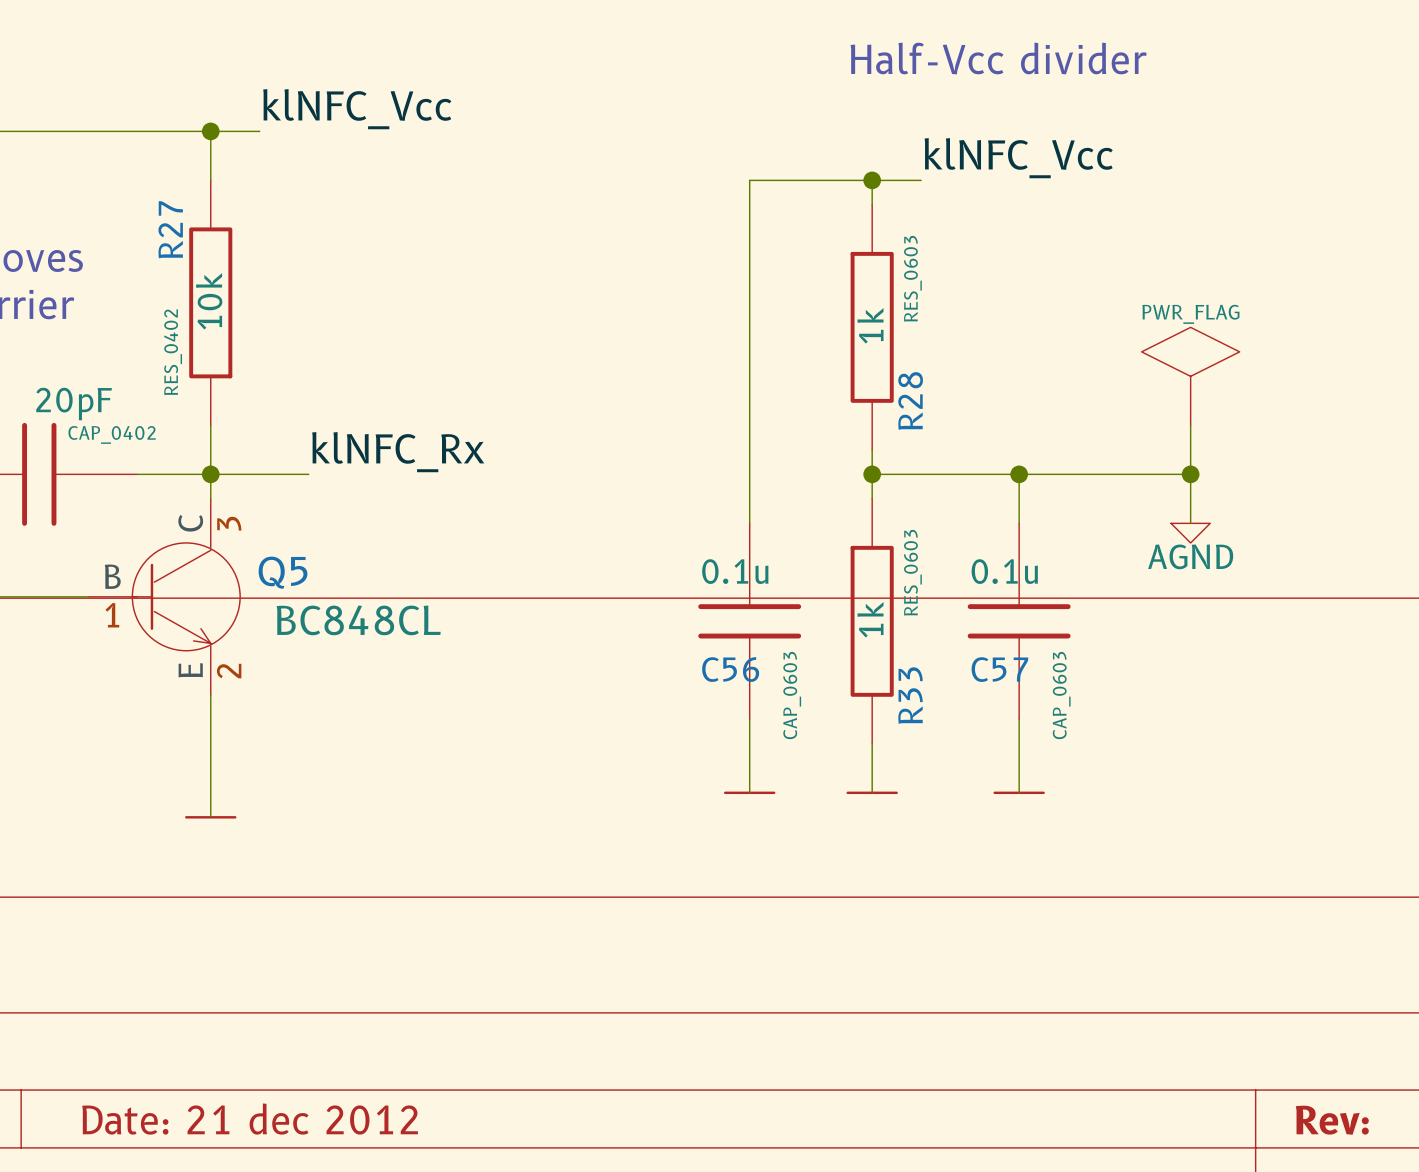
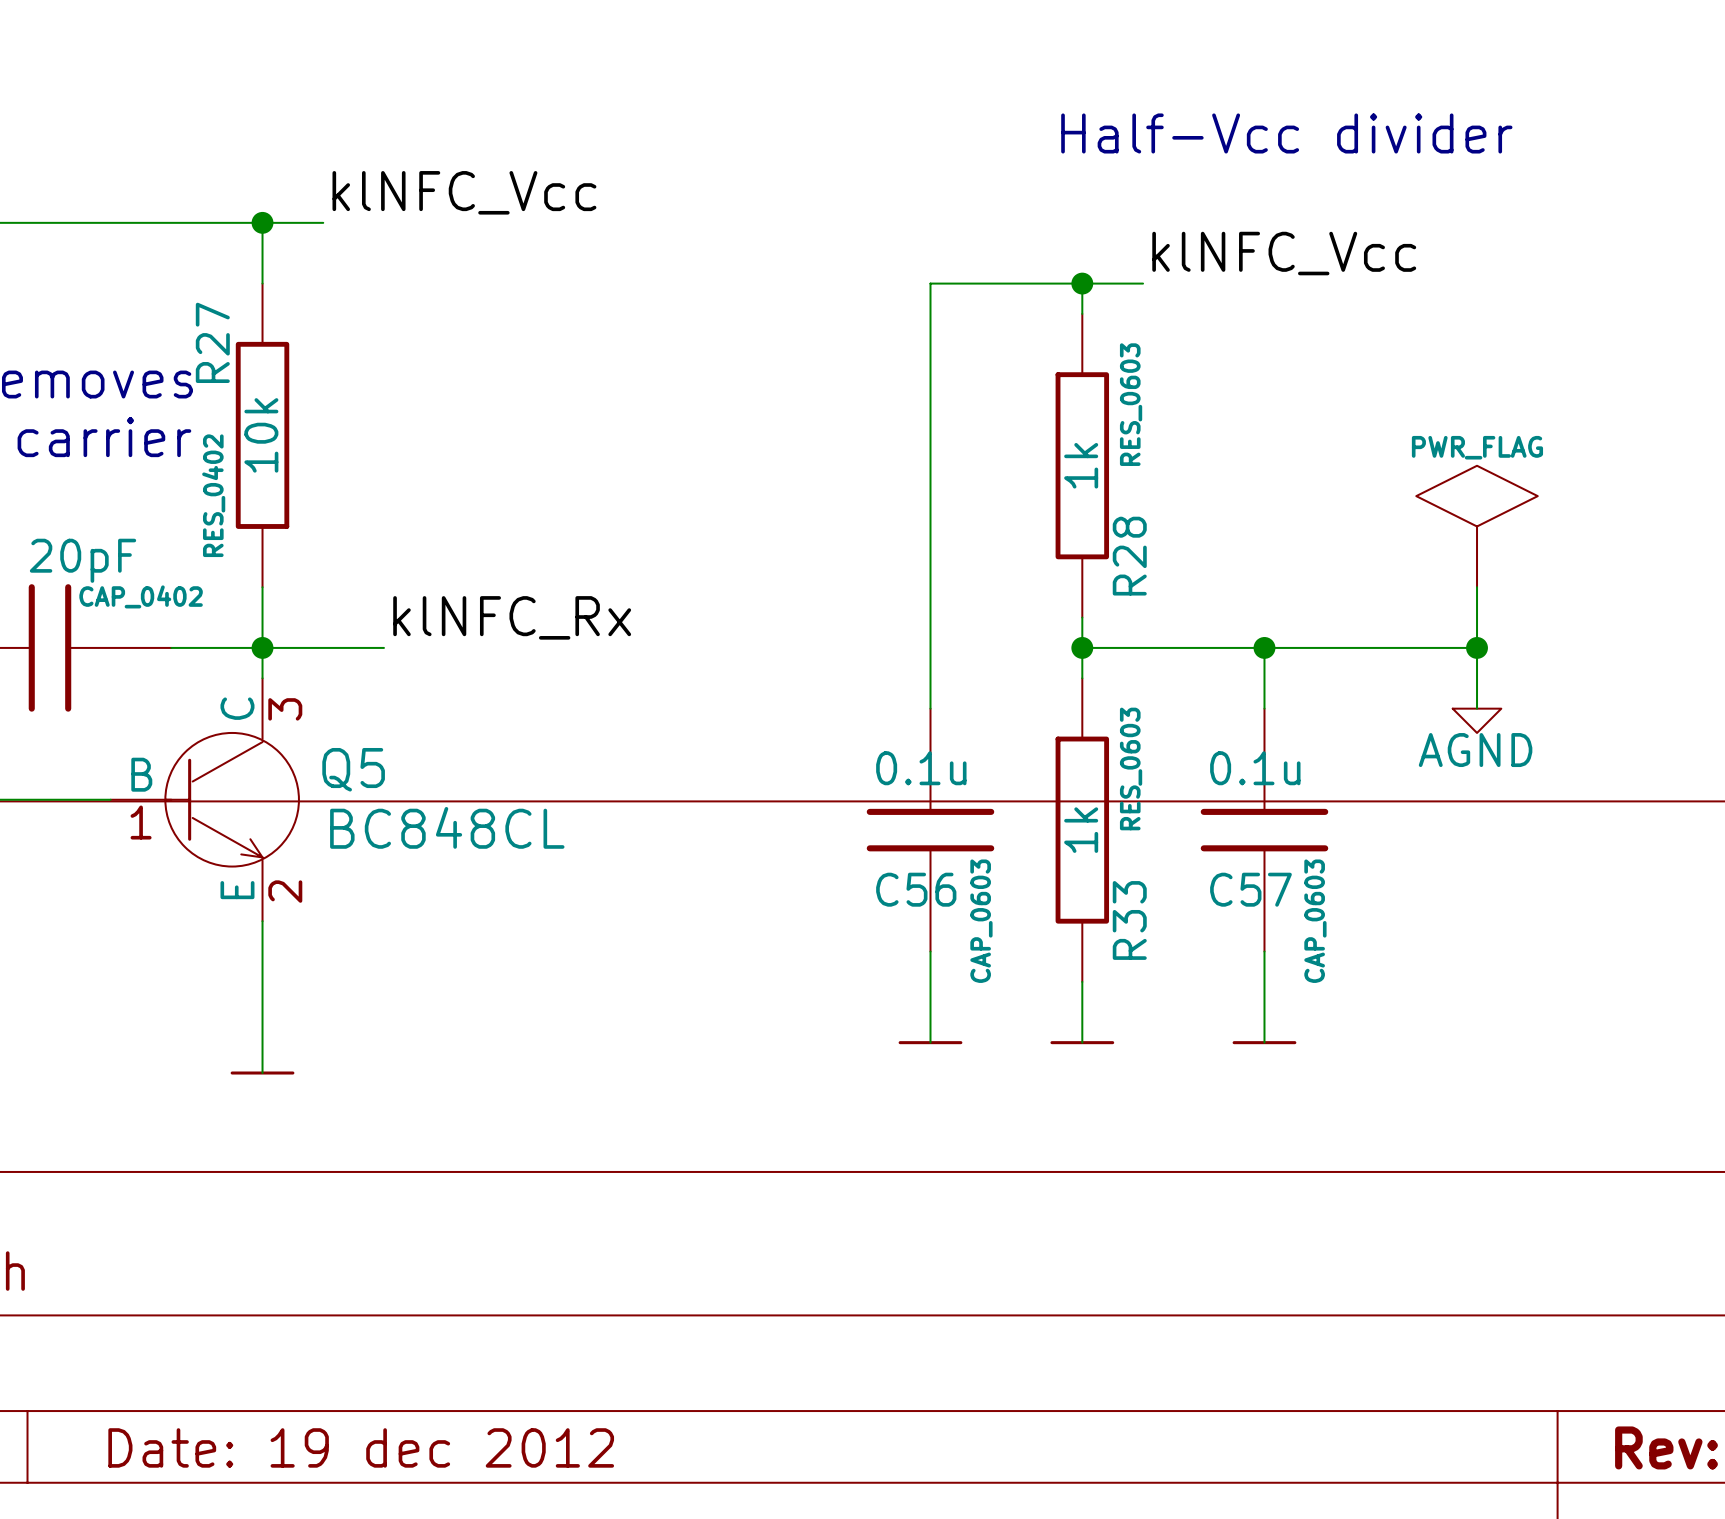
title block: Date: 21 dec 2012 (250, 1119) -> Date: 19 dec 2012 (361, 1447)

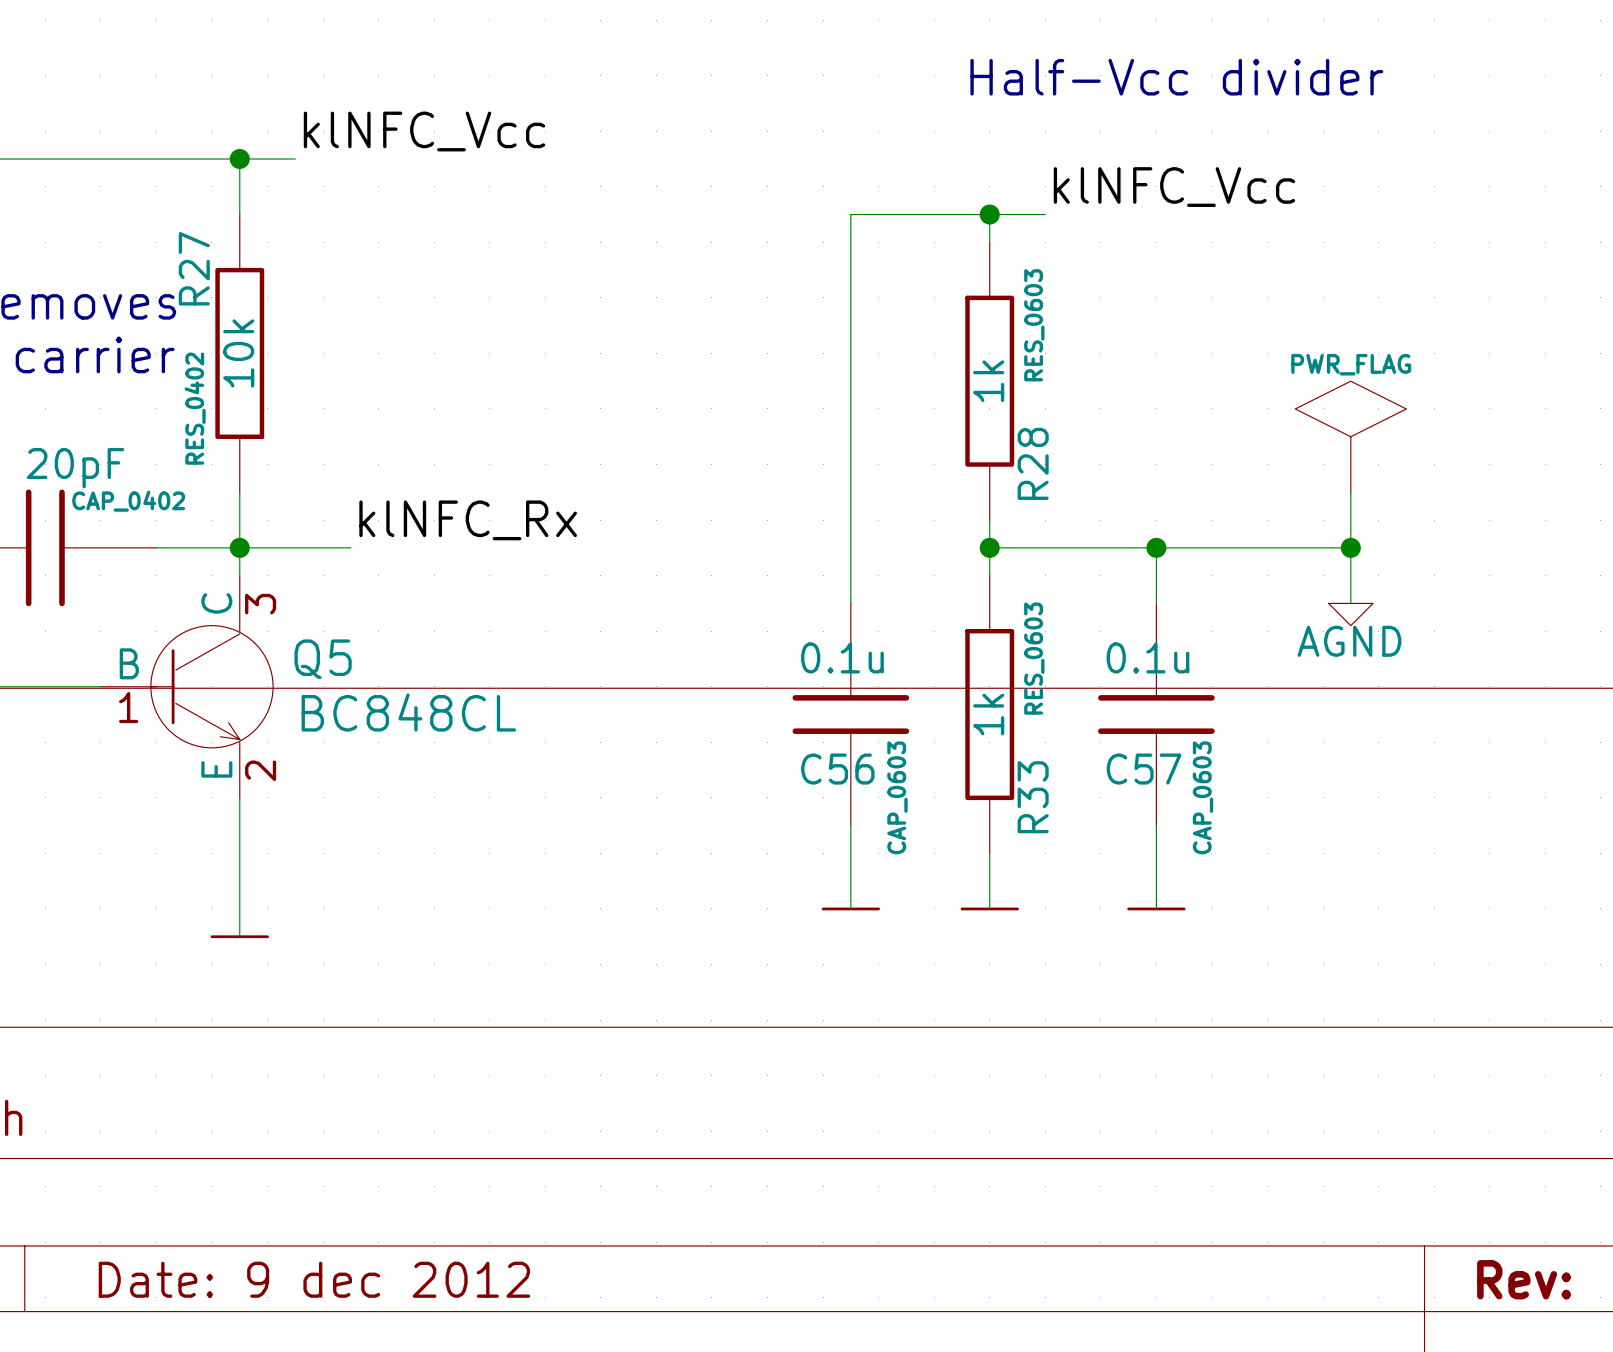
title block: Date: 19 dec 2012 (361, 1447) -> Date: 9 dec 2012 (314, 1279)

